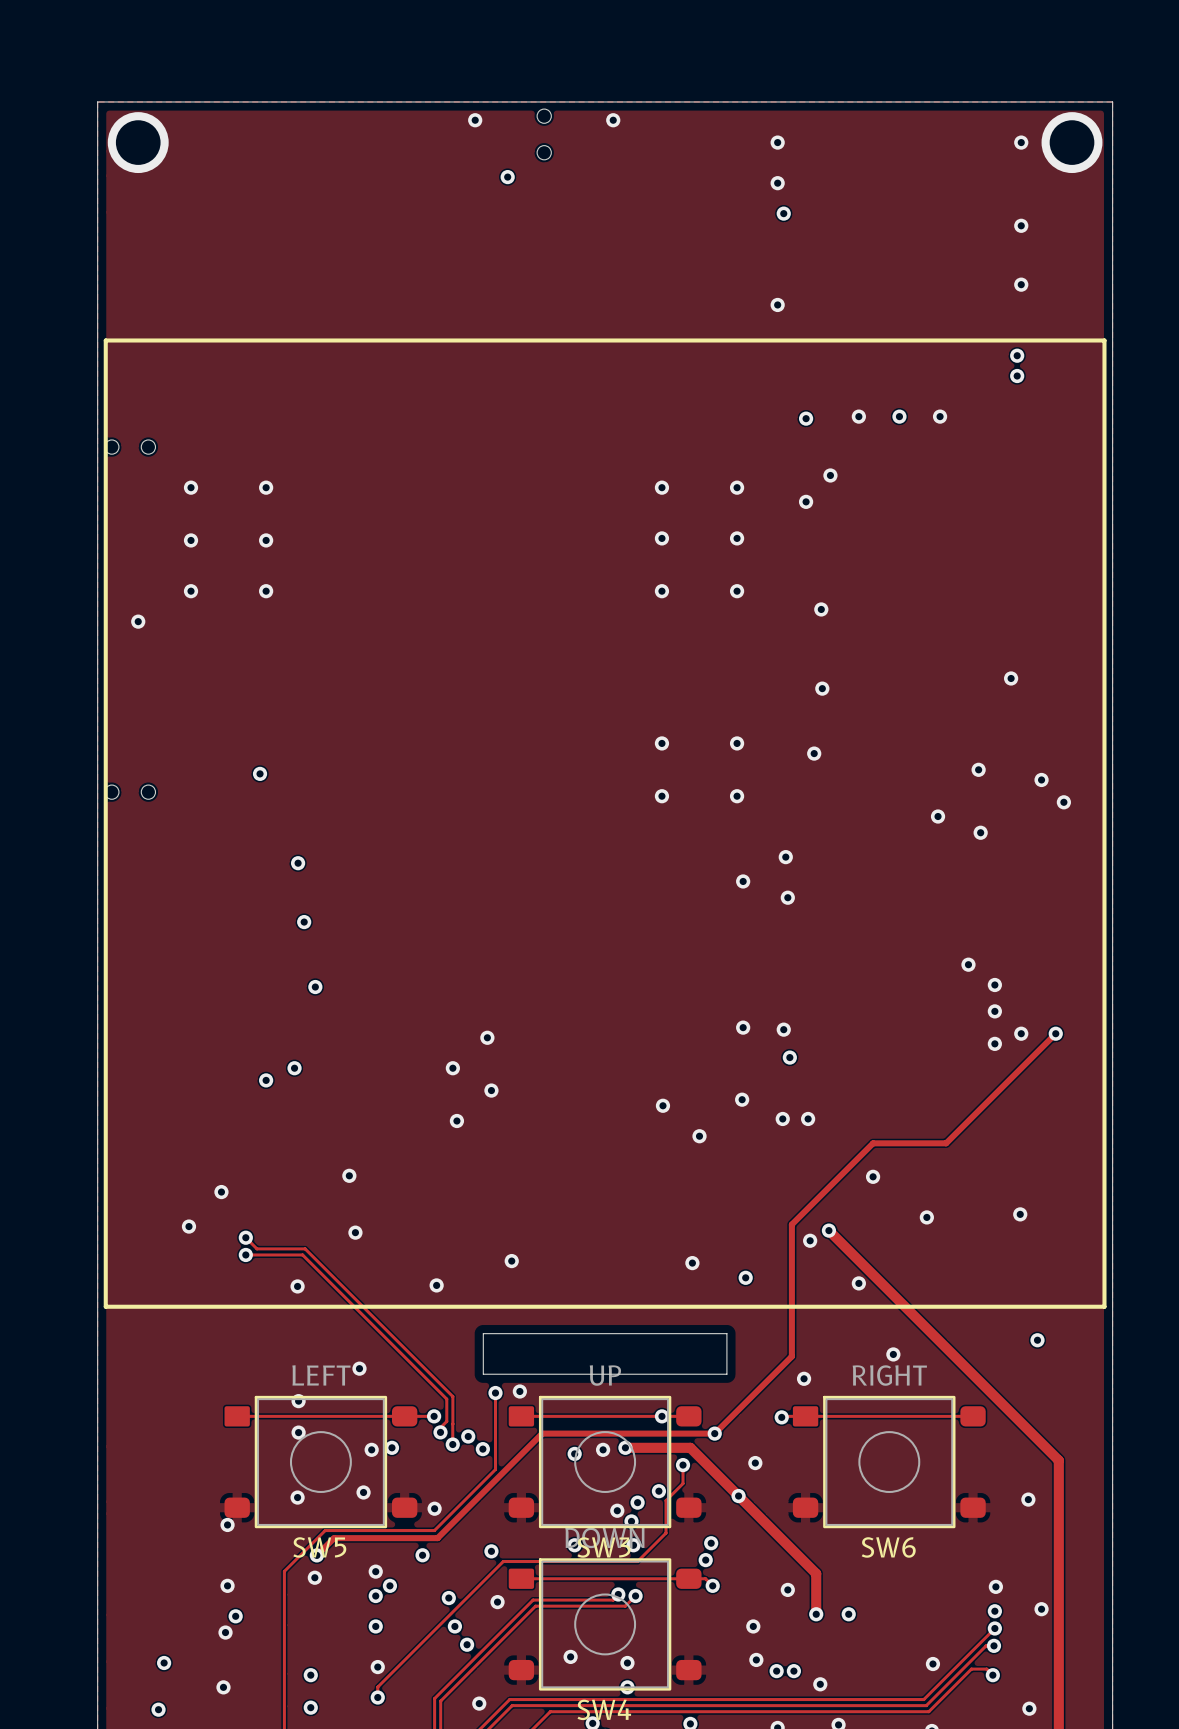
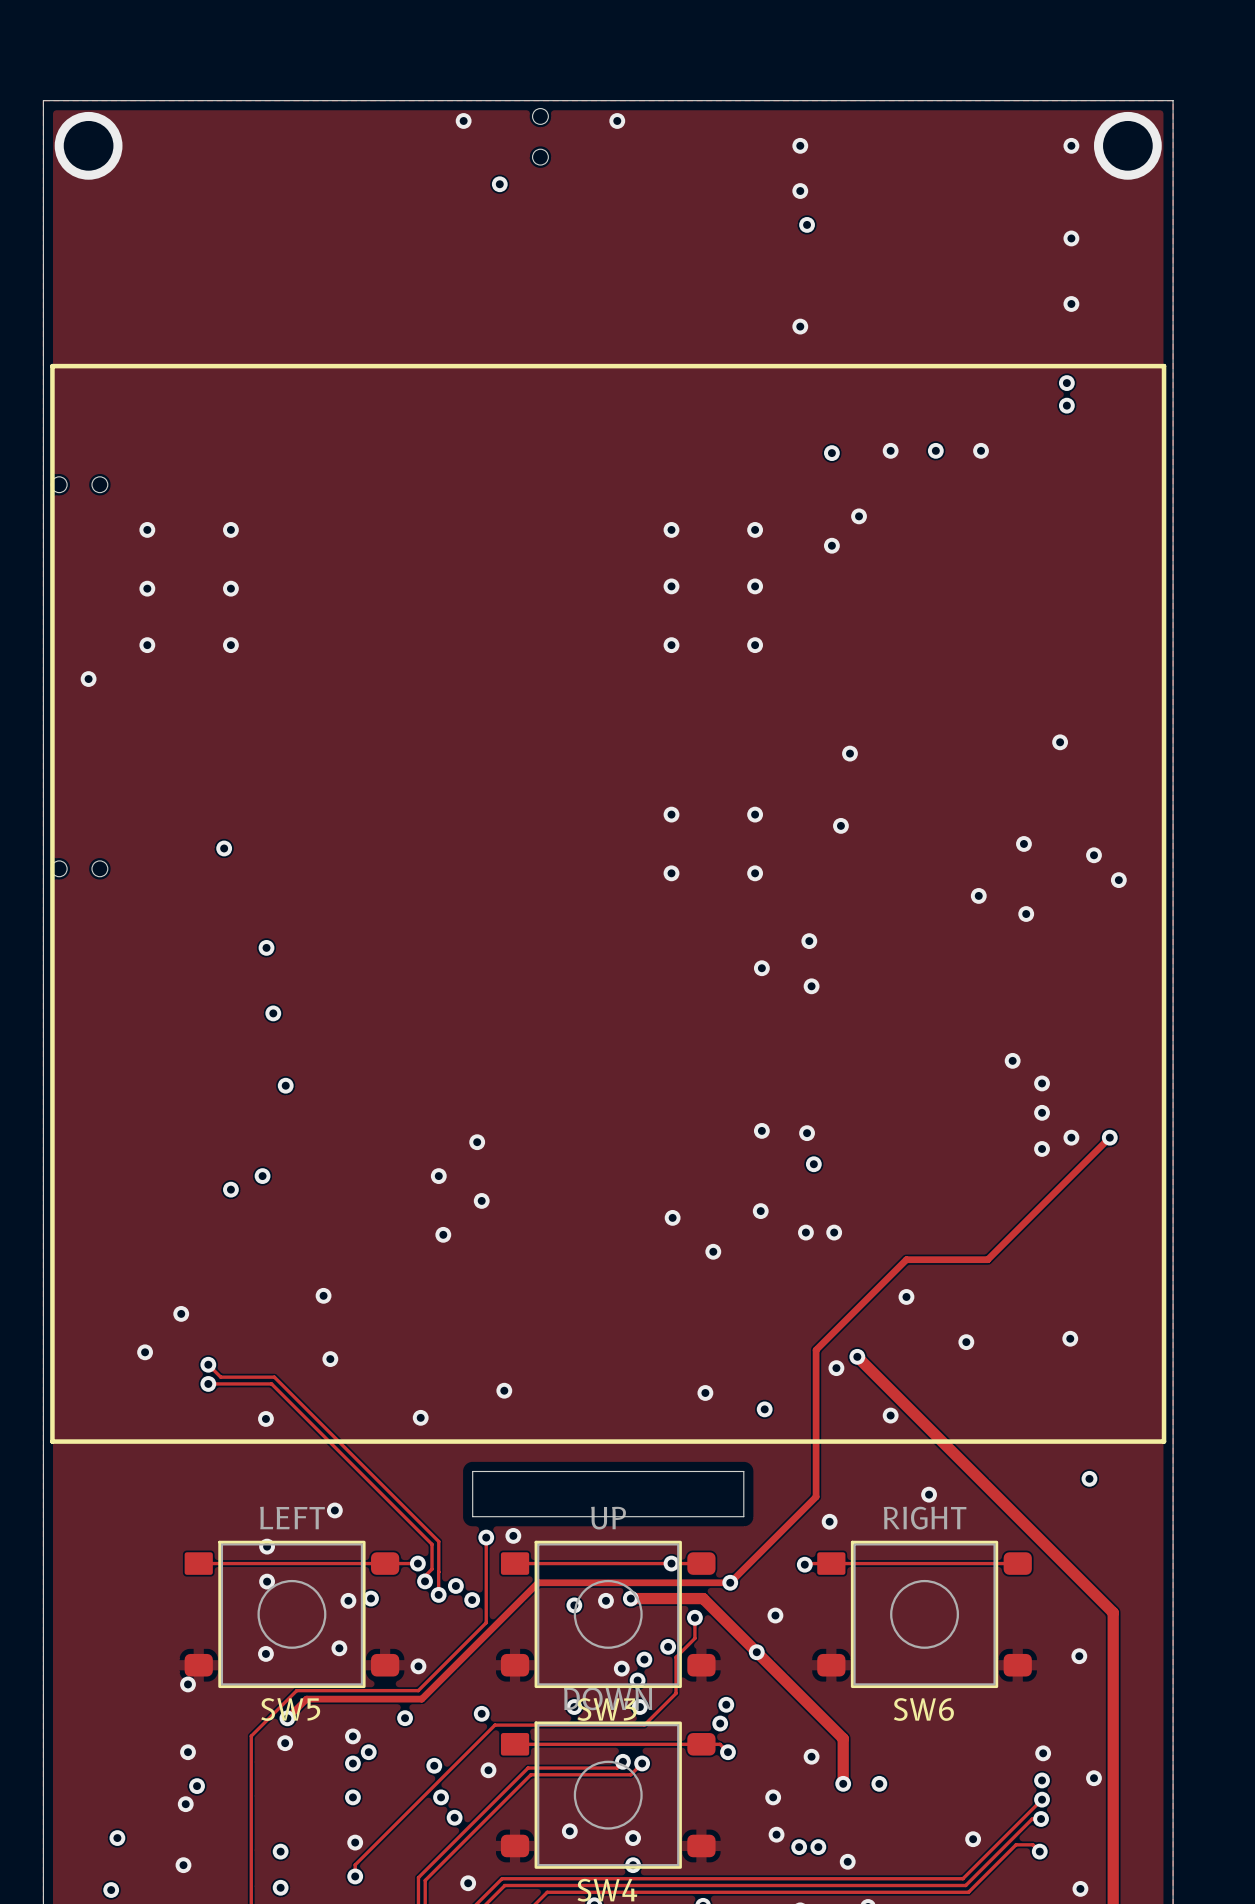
via: (821, 609) -> none

